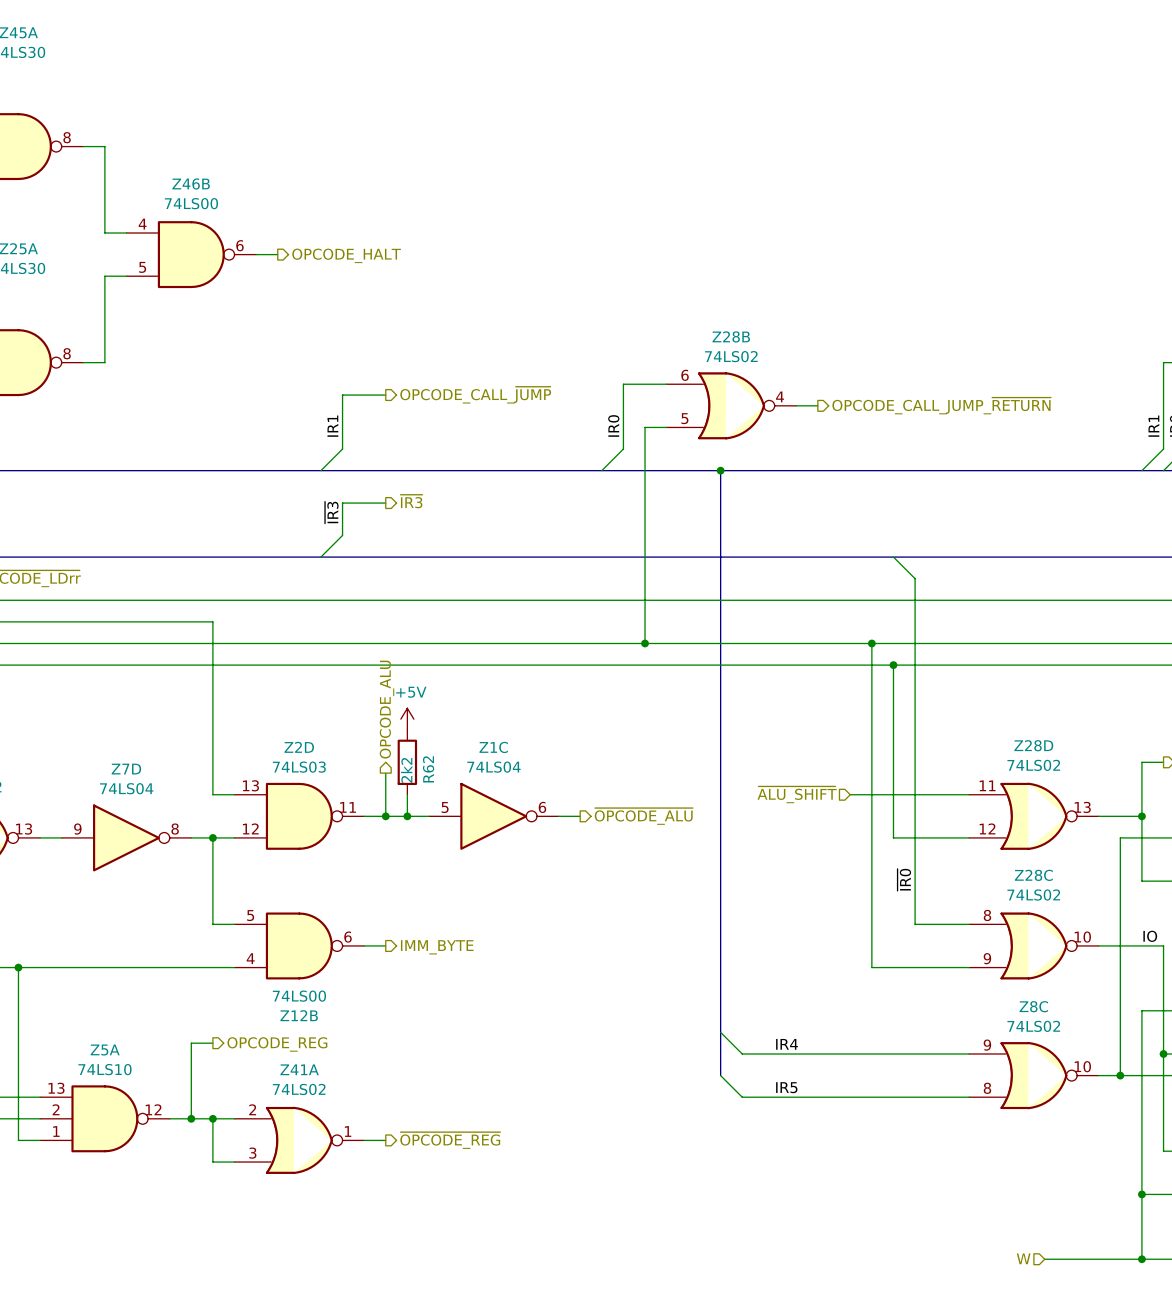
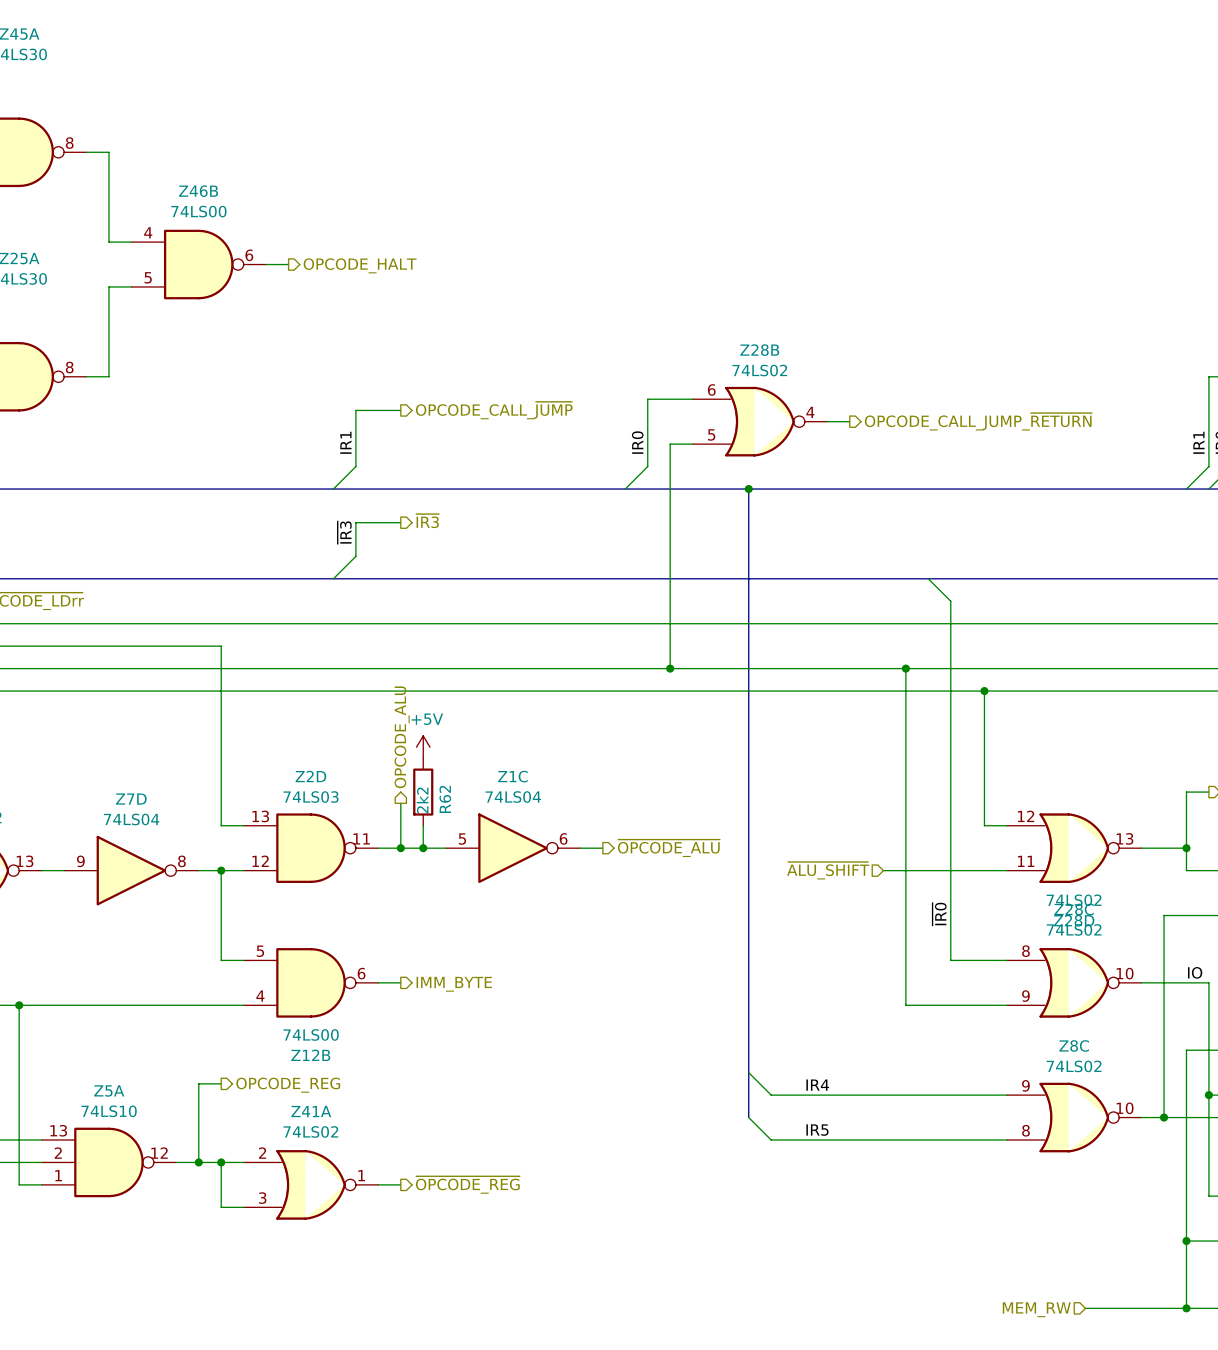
wire: (893, 665) (893, 837) -> (883, 870) (928, 870)
junction: (893, 665) -> none
junction: none -> (984, 691)
hierarchical label position: ~{ALU_SHIFT} (797, 794) -> ~{ALU_SHIFT} (828, 870)
wire: (850, 794) (947, 794) -> (984, 691) (984, 825)
Z28D flip: as is (1033, 816) -> up-down (1074, 848)
wire: (1120, 881) (1120, 837) (1141, 837) (1141, 881) -> (1164, 915) (1186, 915)
hierarchical label: W (1023, 1258) -> MEM_RW (1036, 1309)

